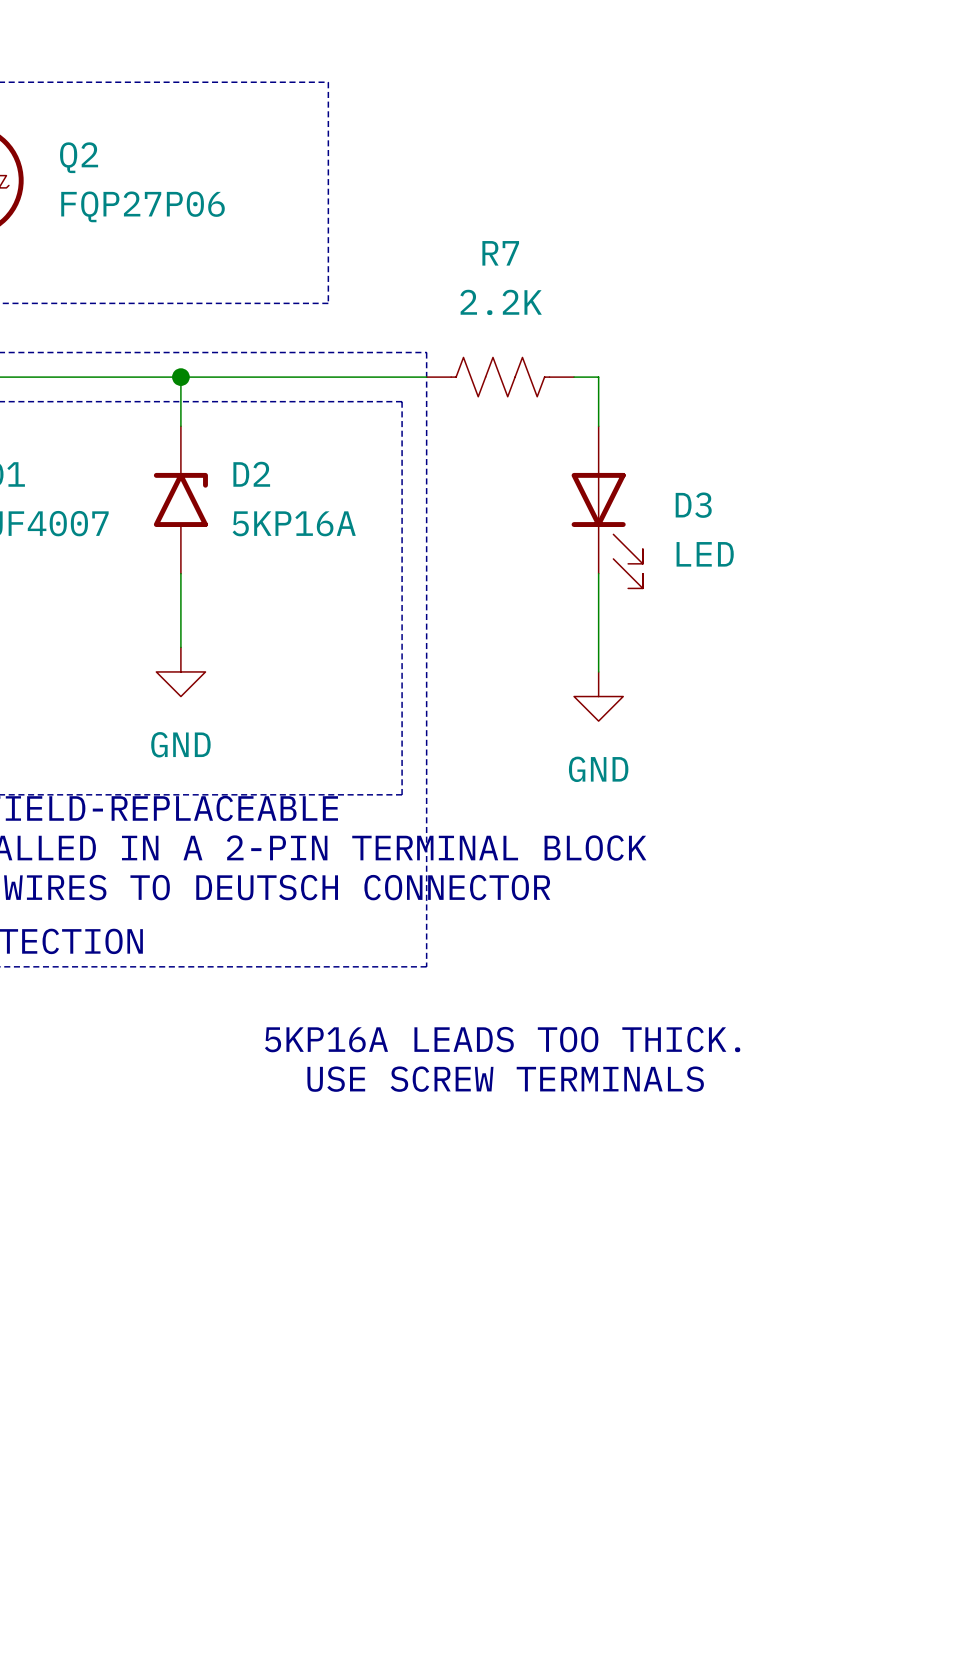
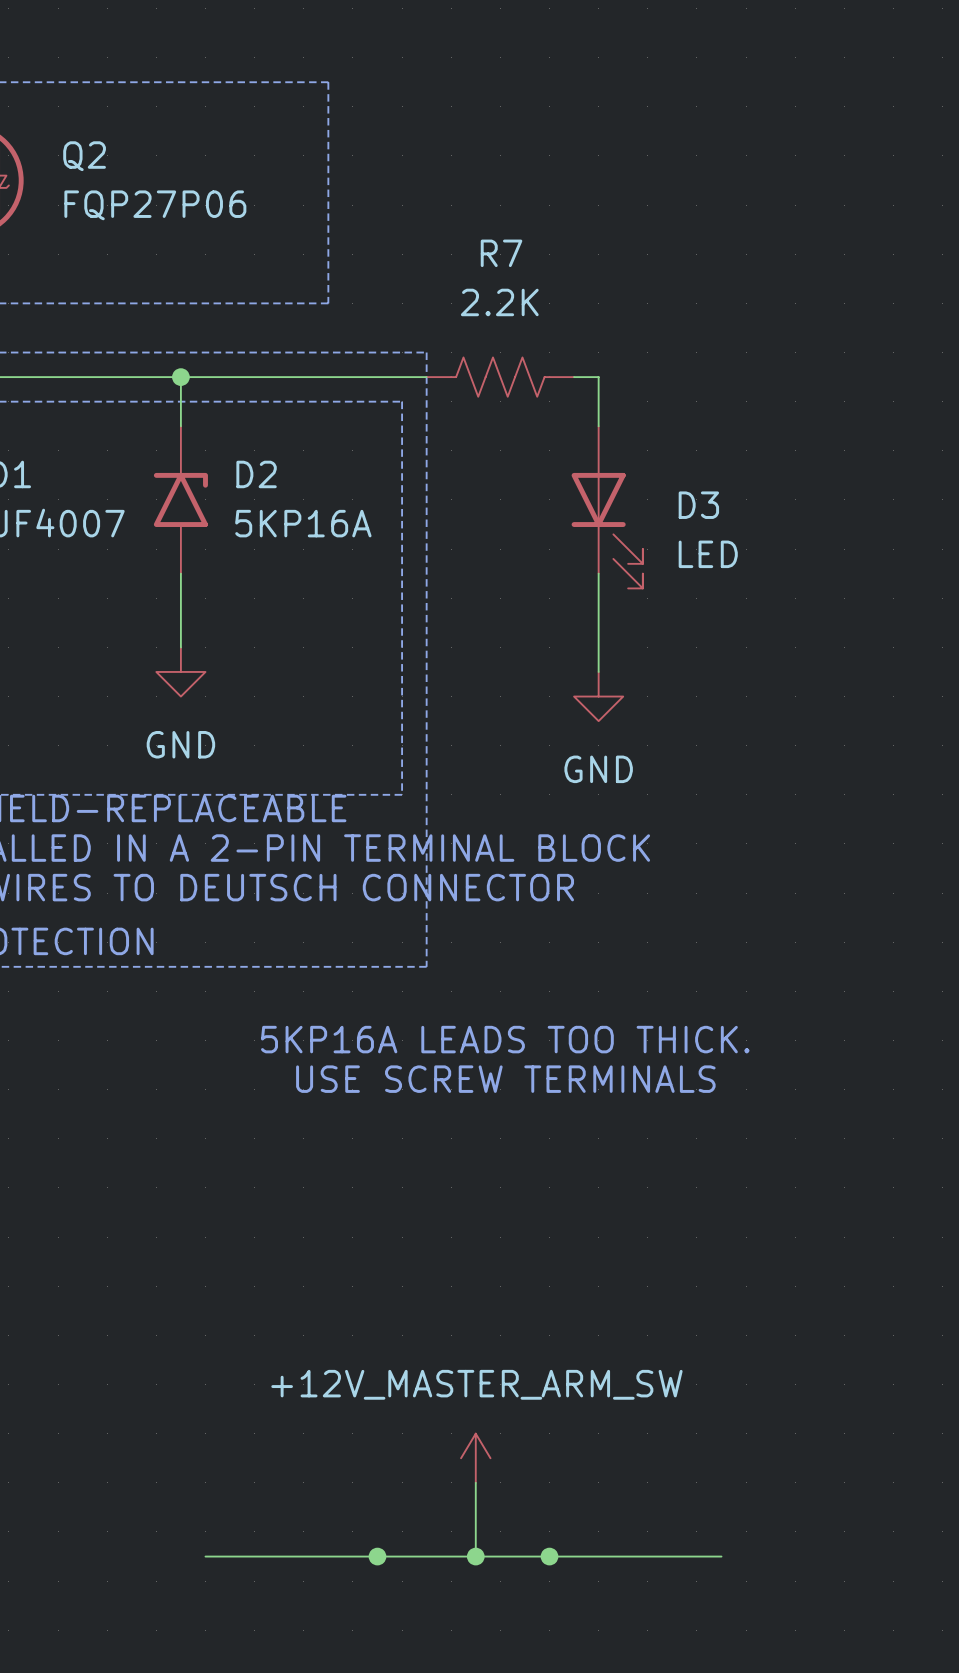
power symbol: none -> +12V_MASTER_ARM_SW (475, 1458)
wire: none -> (475, 1482) (475, 1556)
wire: none -> (205, 1556) (721, 1556)
junction: none -> (377, 1556)
junction: none -> (475, 1556)
junction: none -> (549, 1556)

